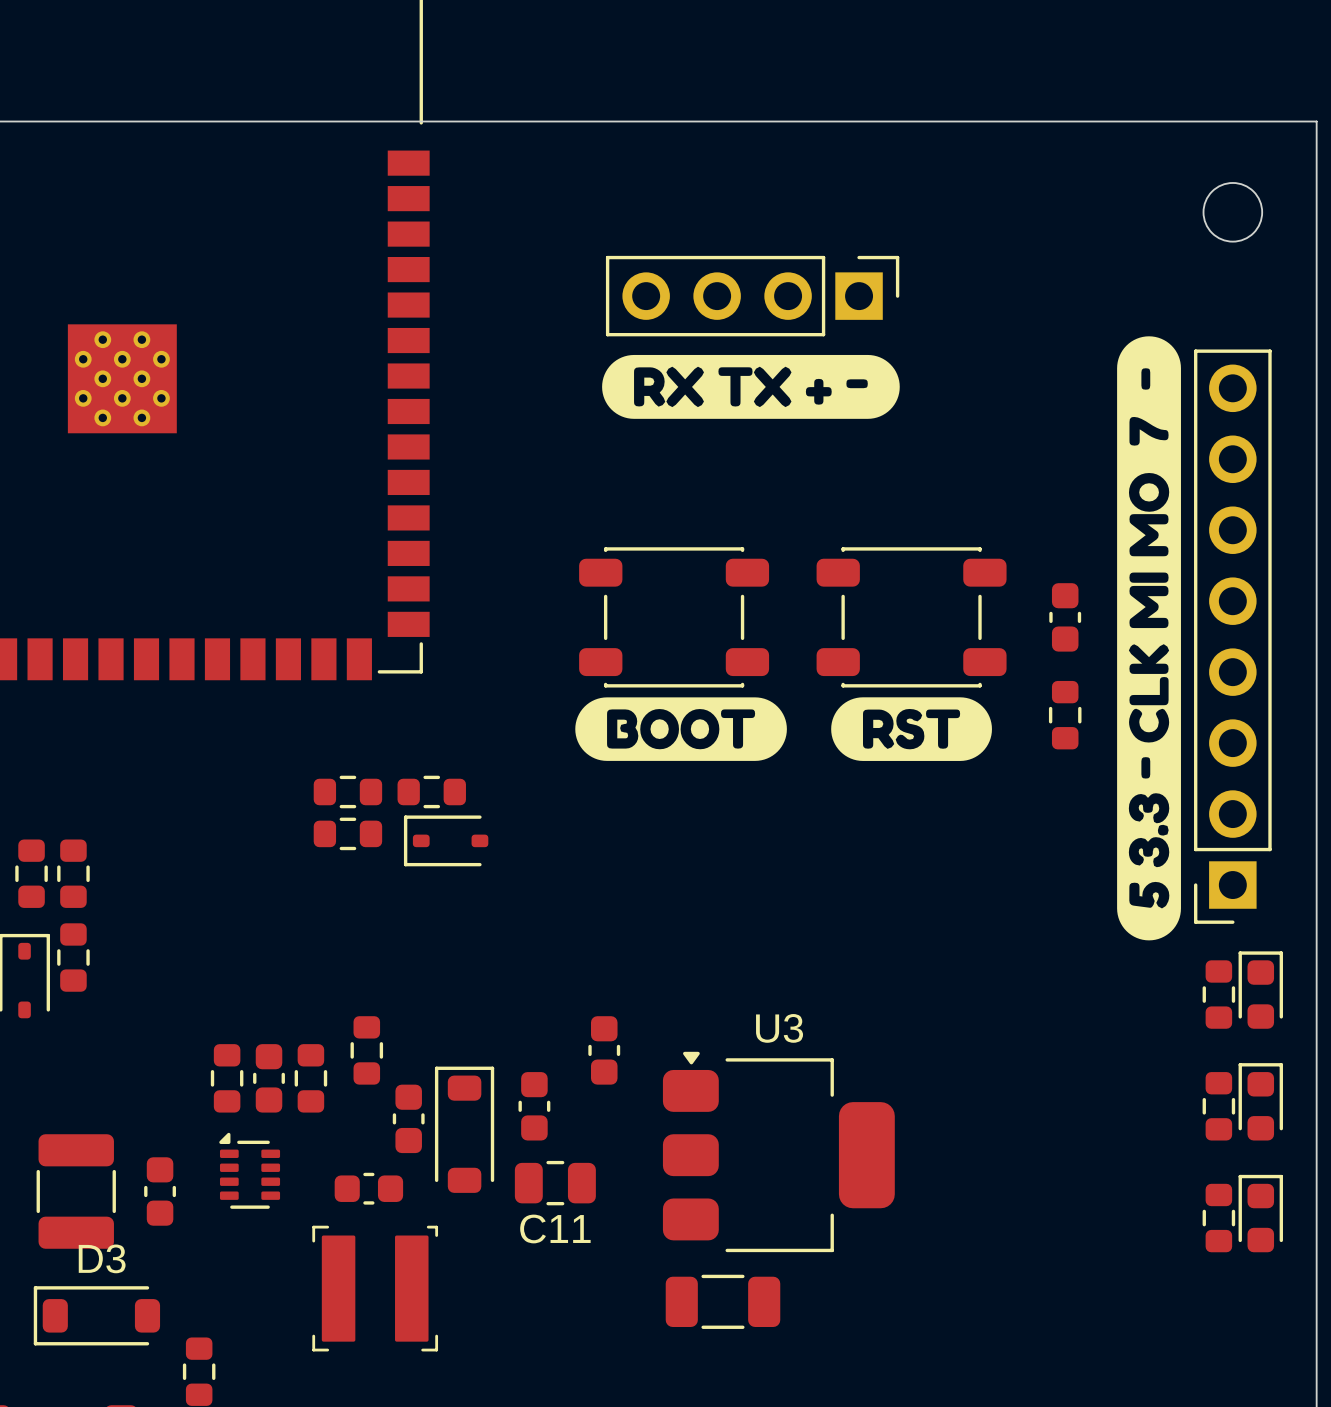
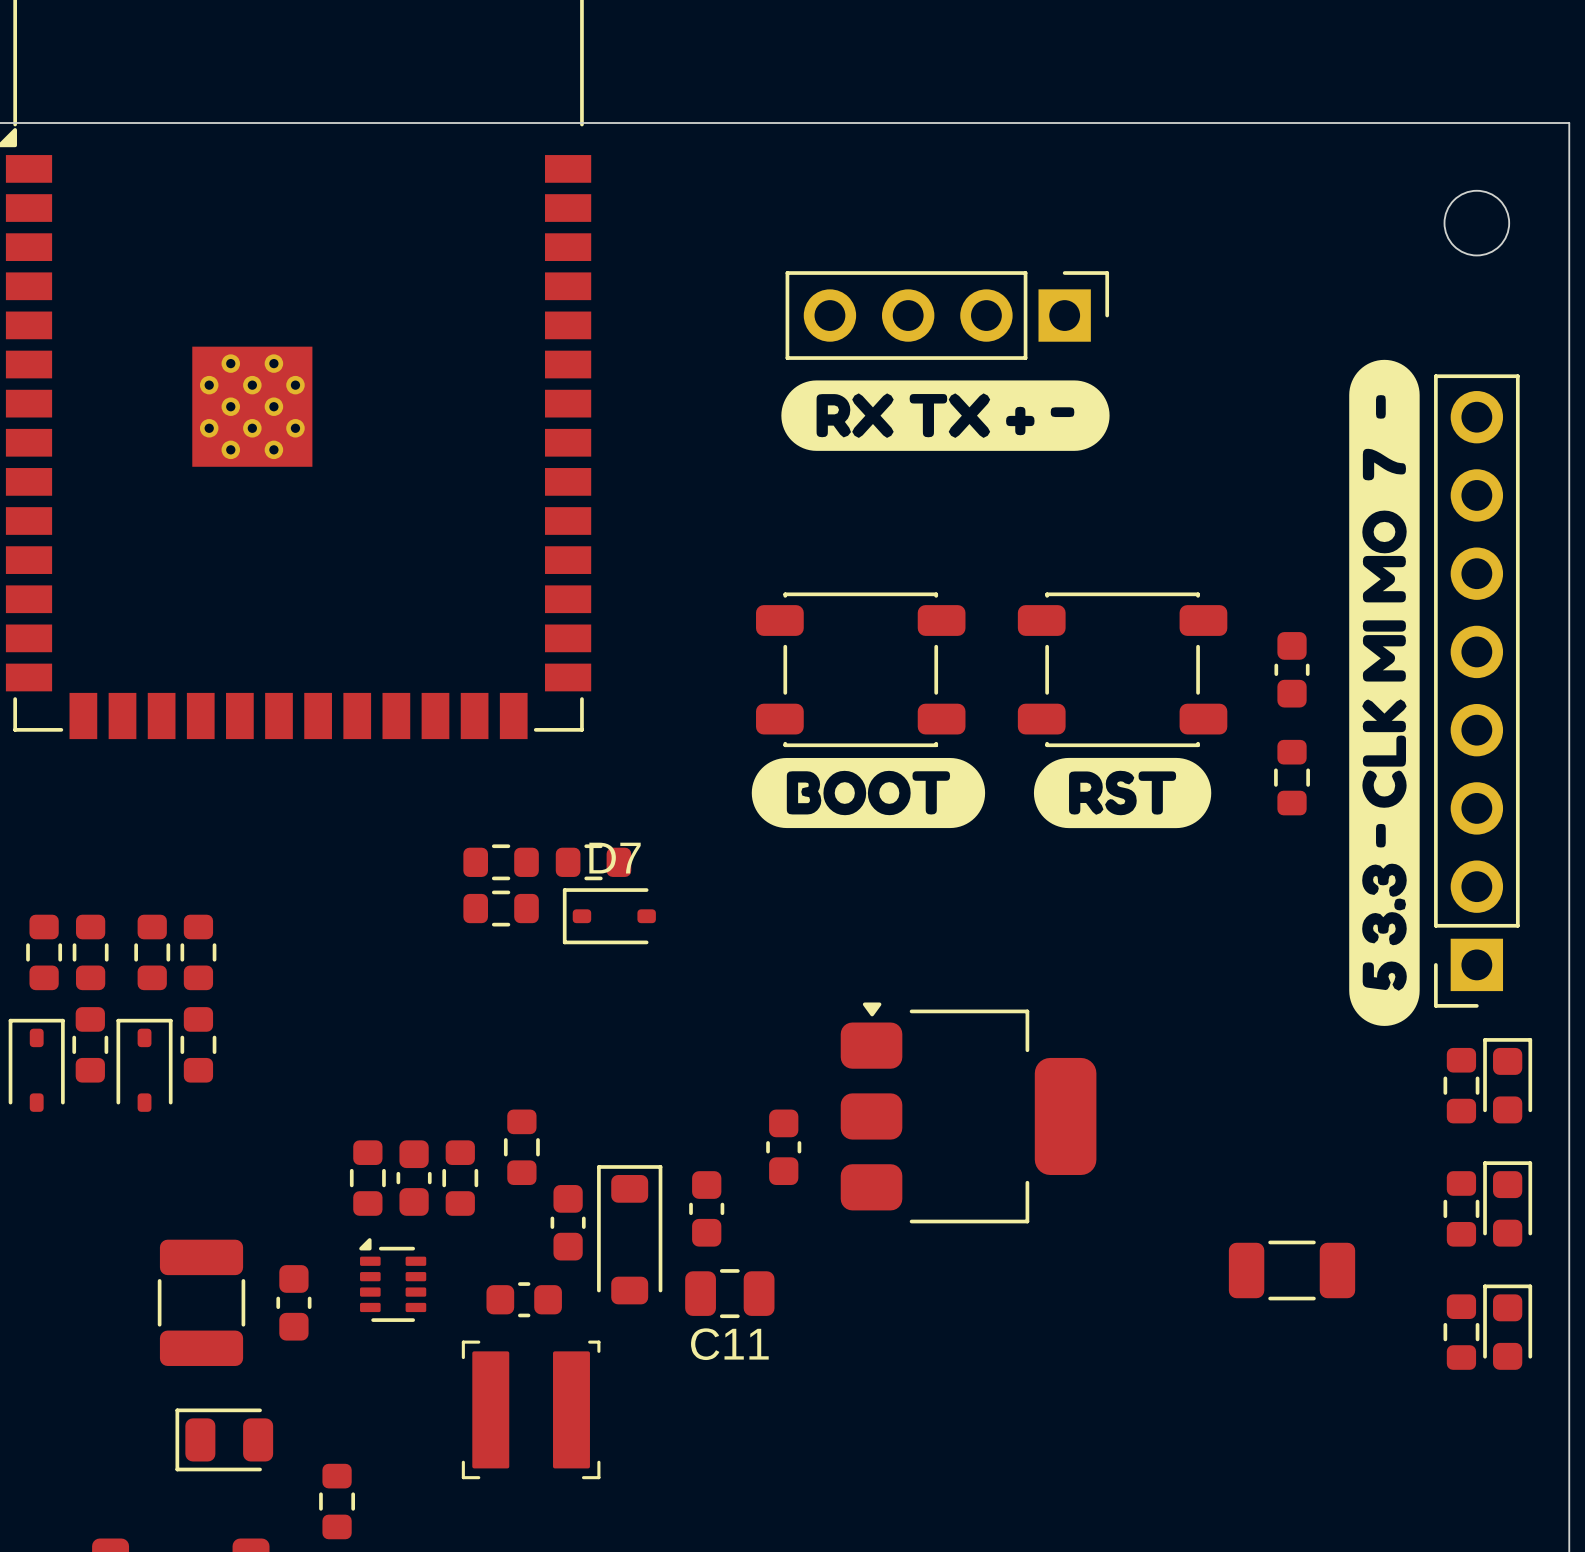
D7 name: none -> D7 (615, 858)
part: none -> (968, 1112)
U3: (778, 1151) -> none
part position: (722, 1301) -> (1292, 1270)
D3: (96, 1315) -> none
part: none -> (224, 1439)

